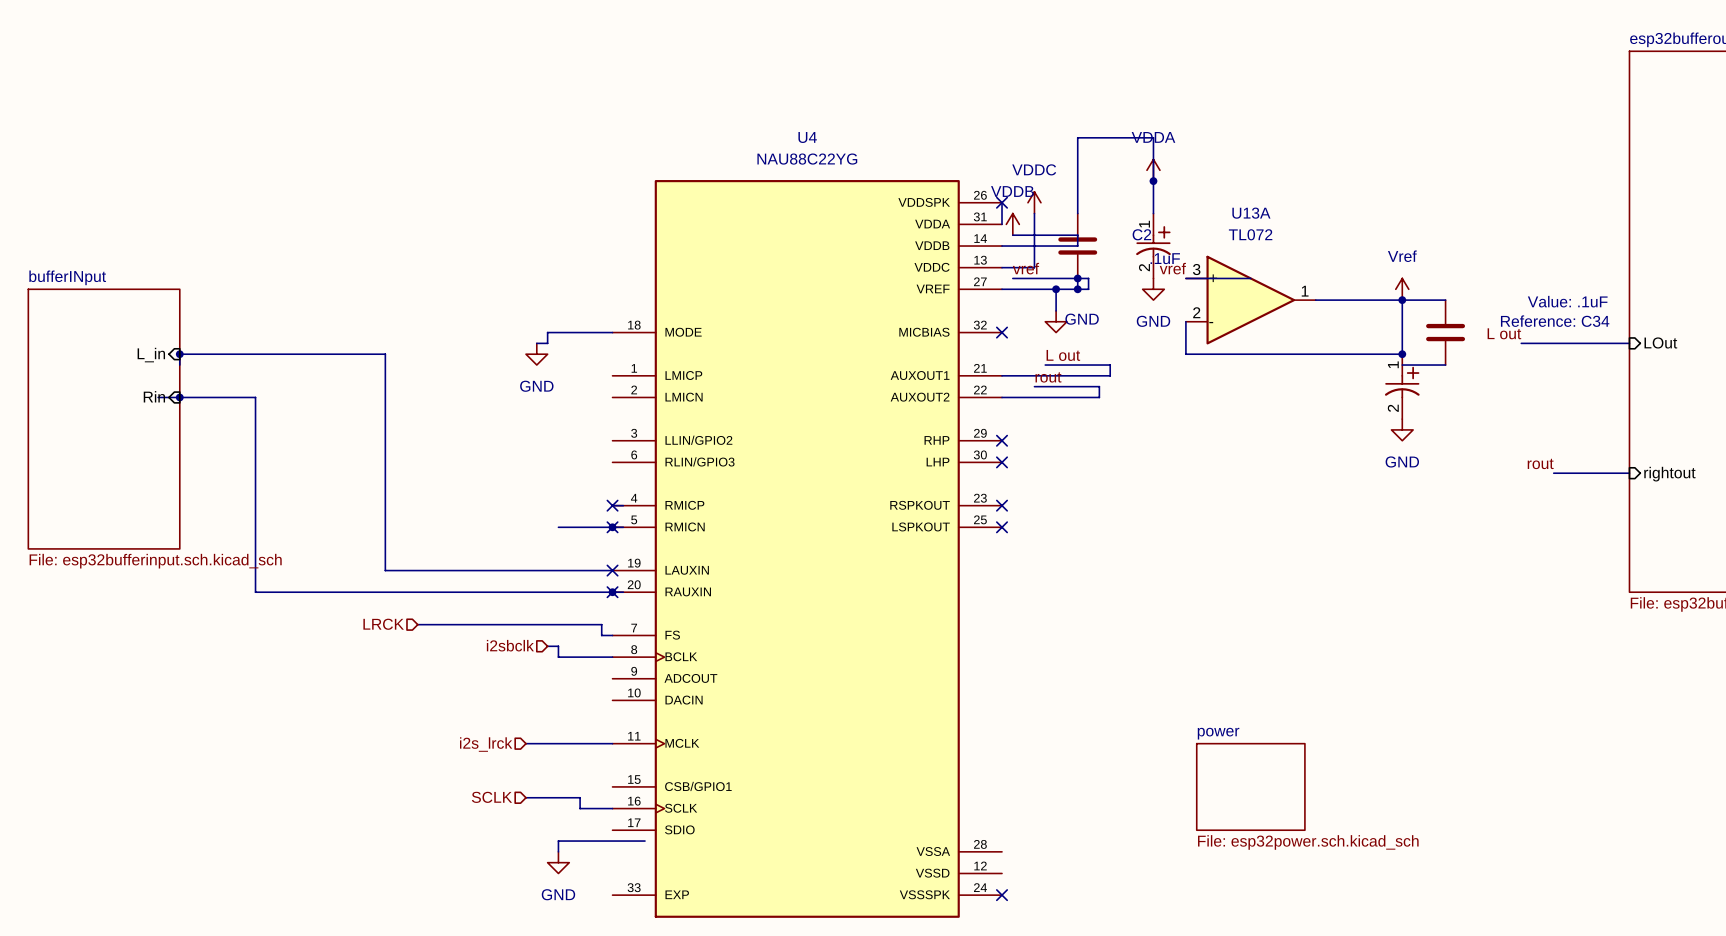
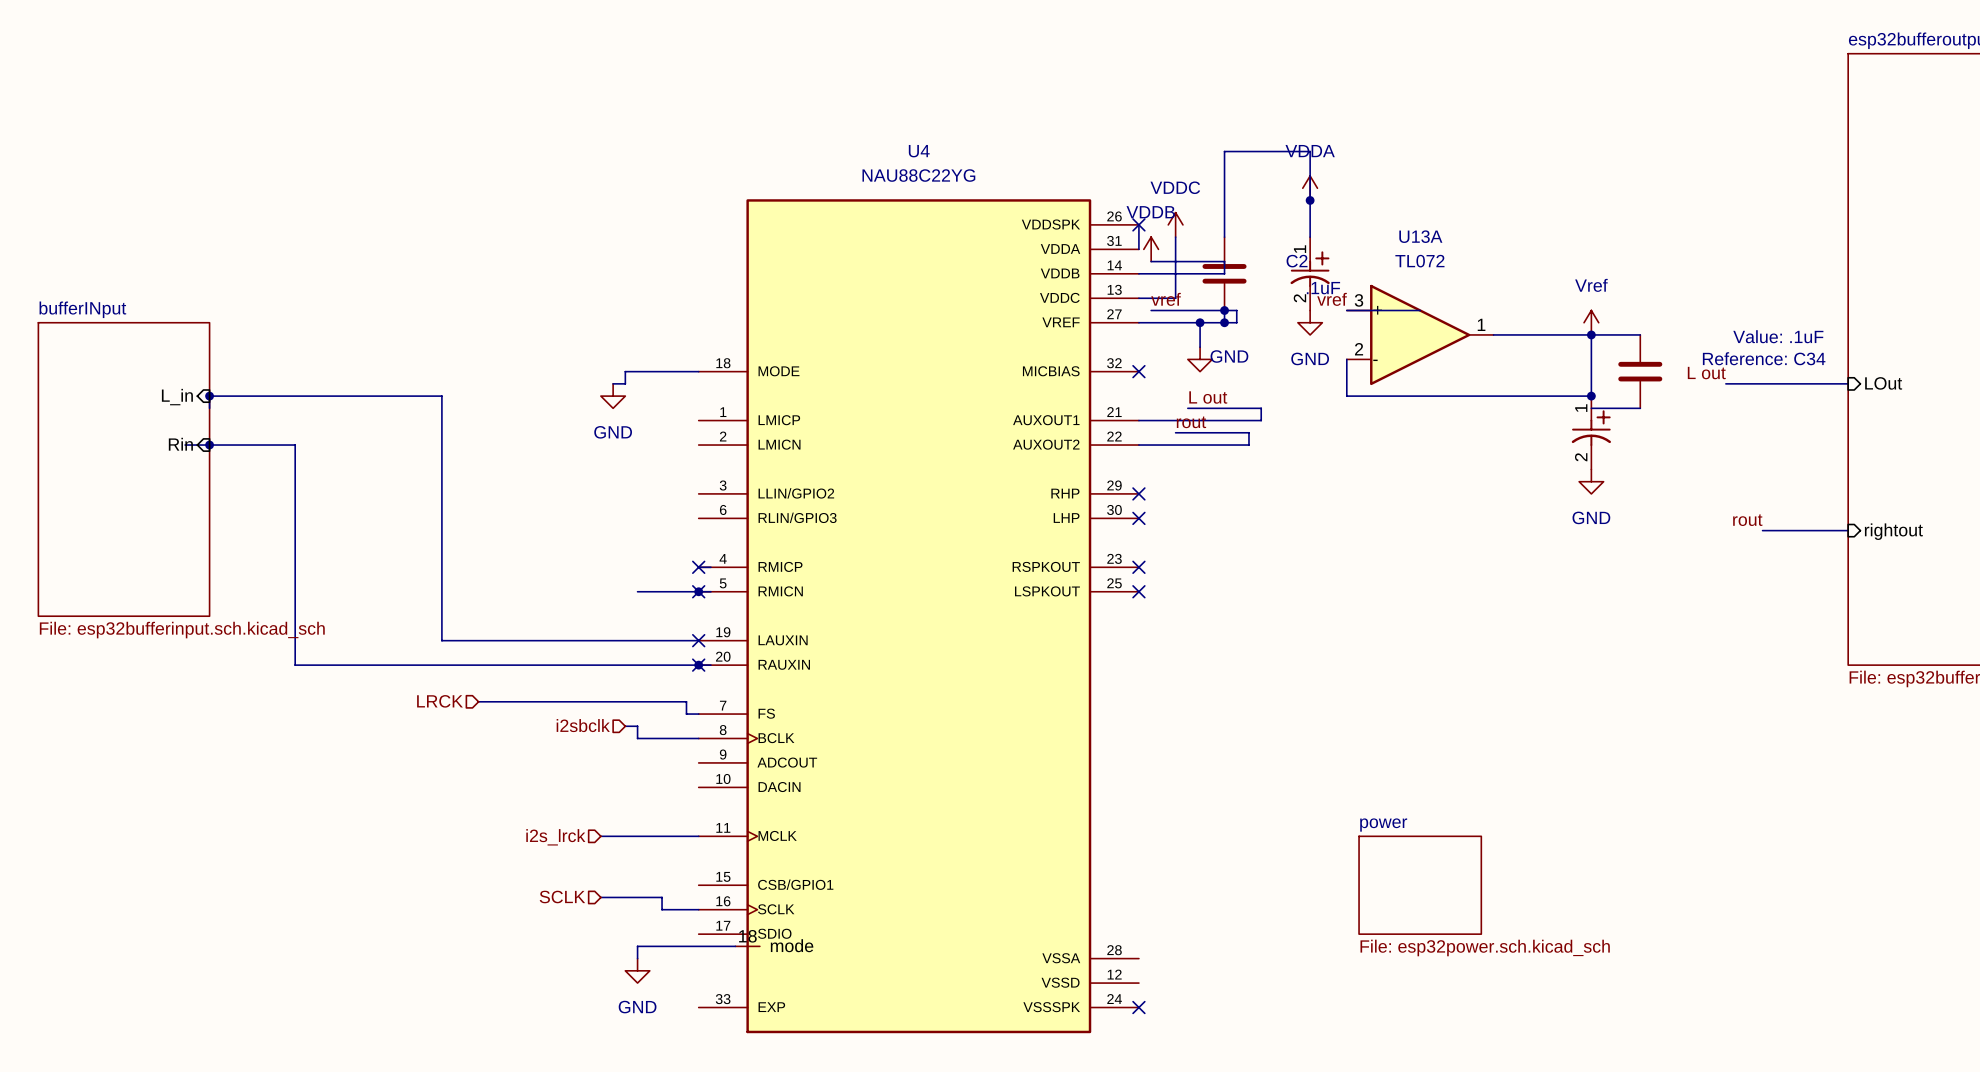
U4 symbol: [612, 180, 1003, 918] -> [698, 199, 1139, 1034]

